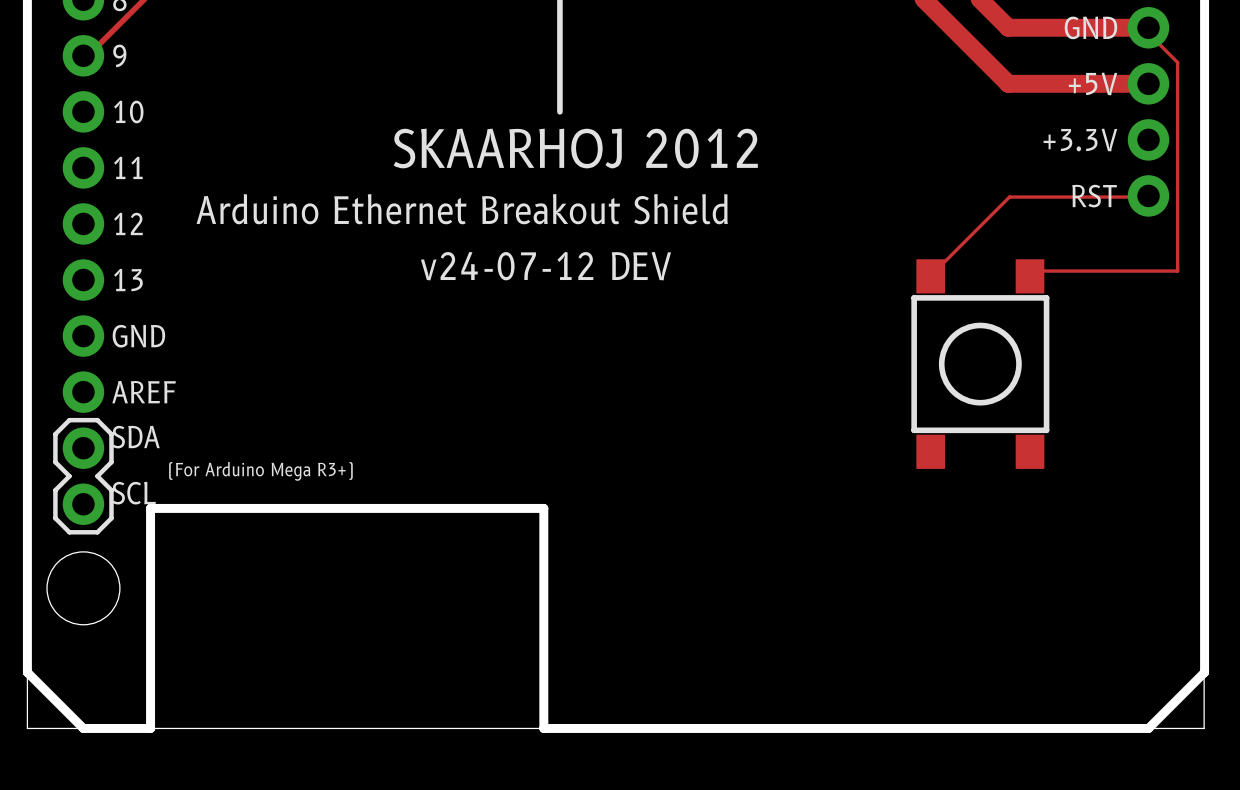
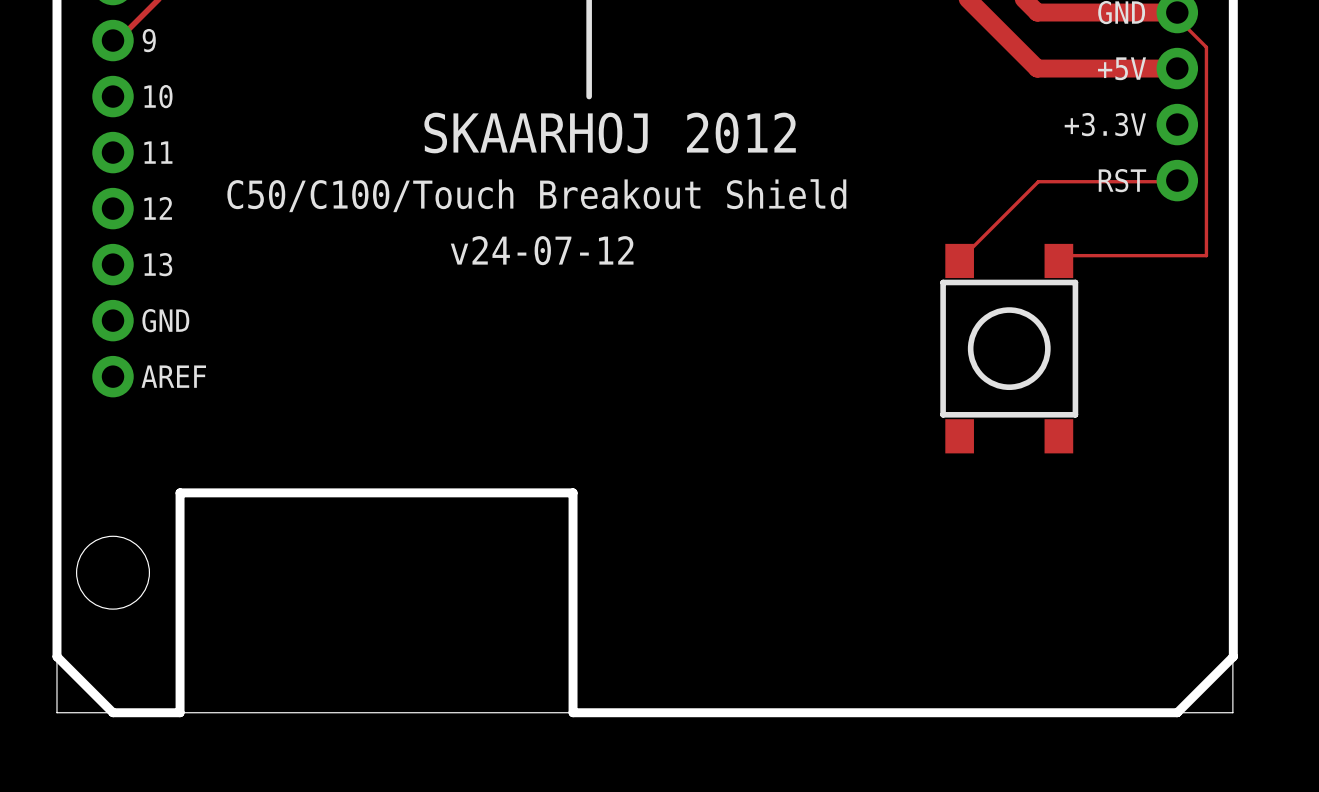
text: Arduino Ethernet Breakout Shield (462, 209) -> C50/C100/Touch Breakout Shield (536, 195)
text: v24-07-12 DEV (546, 266) -> v24-07-12 (542, 250)
text: SDA (136, 437) -> none
text: (For Arduino Mega R3+) (260, 471) -> none
part: (83, 476) -> none
text: SCL (134, 493) -> none

